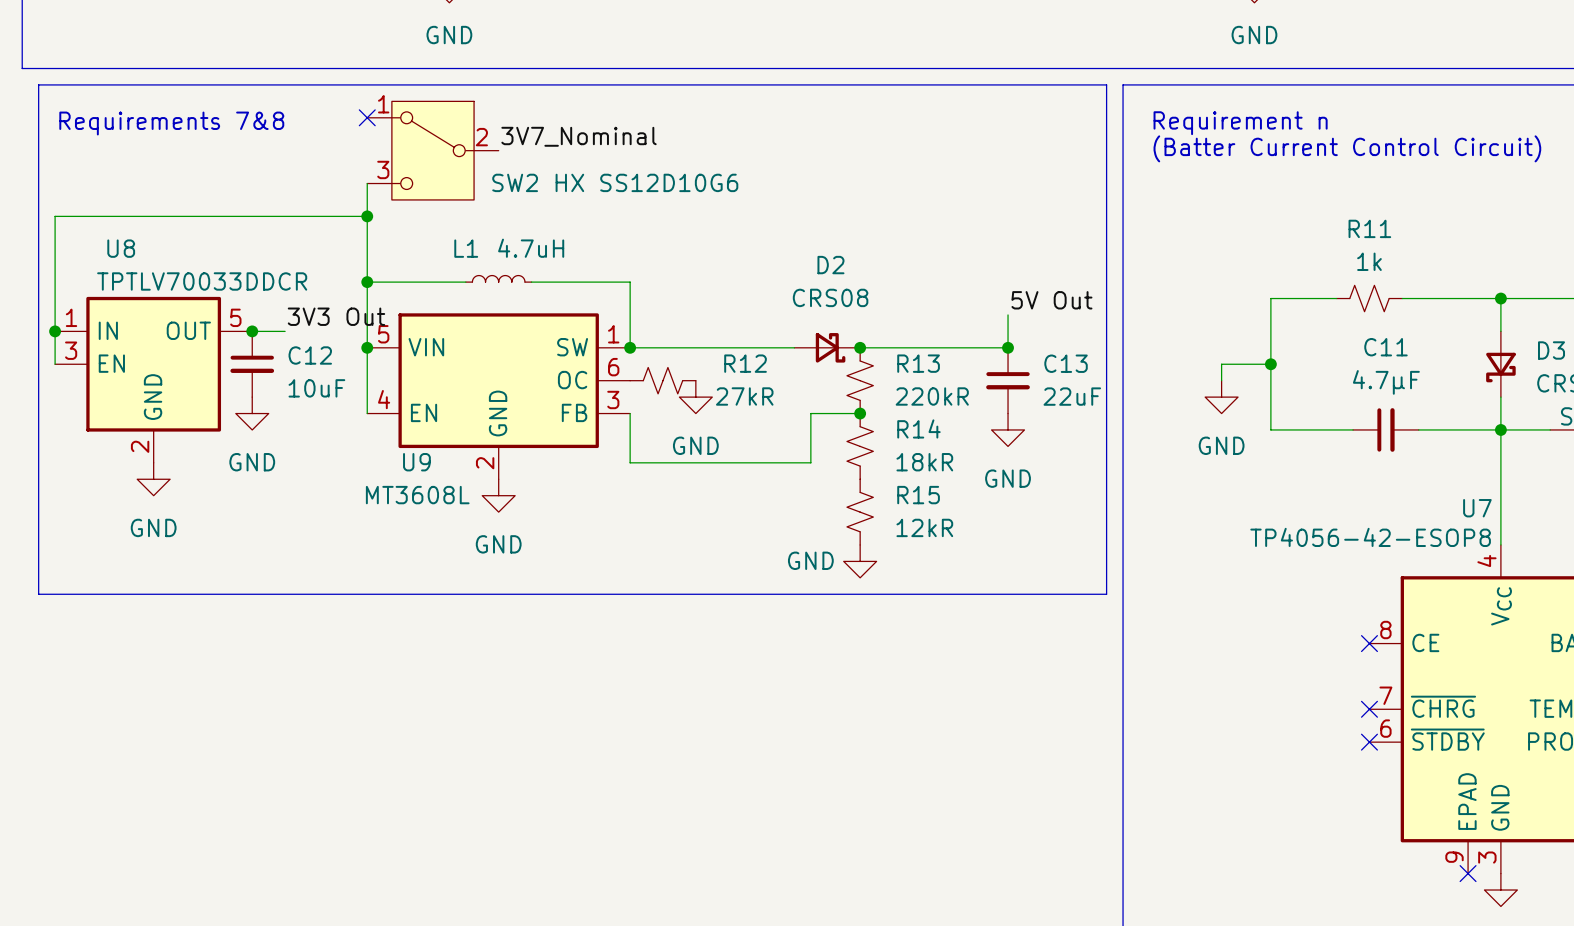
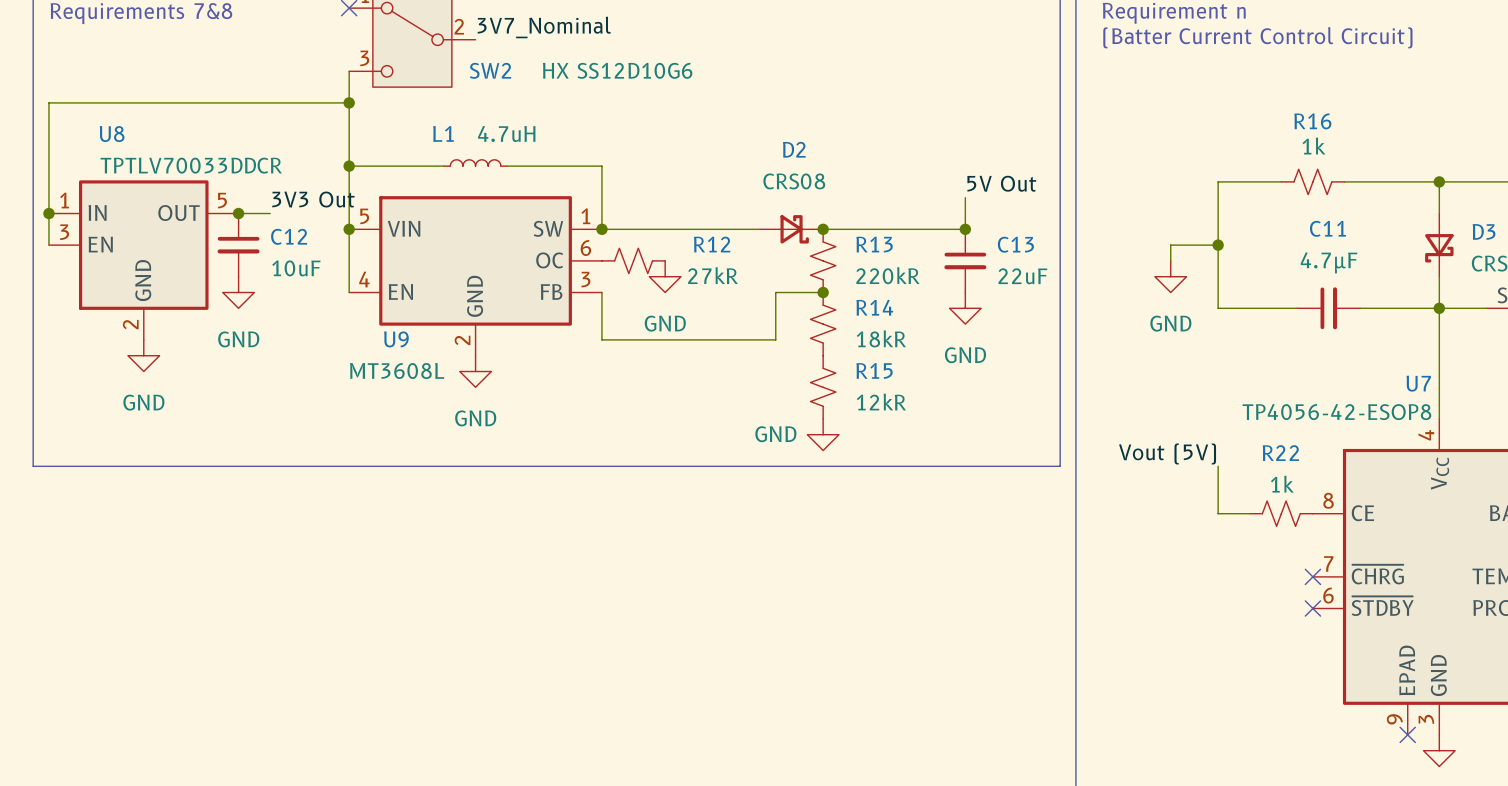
R11 name: R11 (1369, 228) -> R16 (1312, 121)
label: none -> Vout (5V) (1167, 453)
wire: none -> (1218, 466) (1218, 513) (1249, 513)
R22: none -> 1k (1281, 513)
no-connect mark: (1369, 643) -> none

